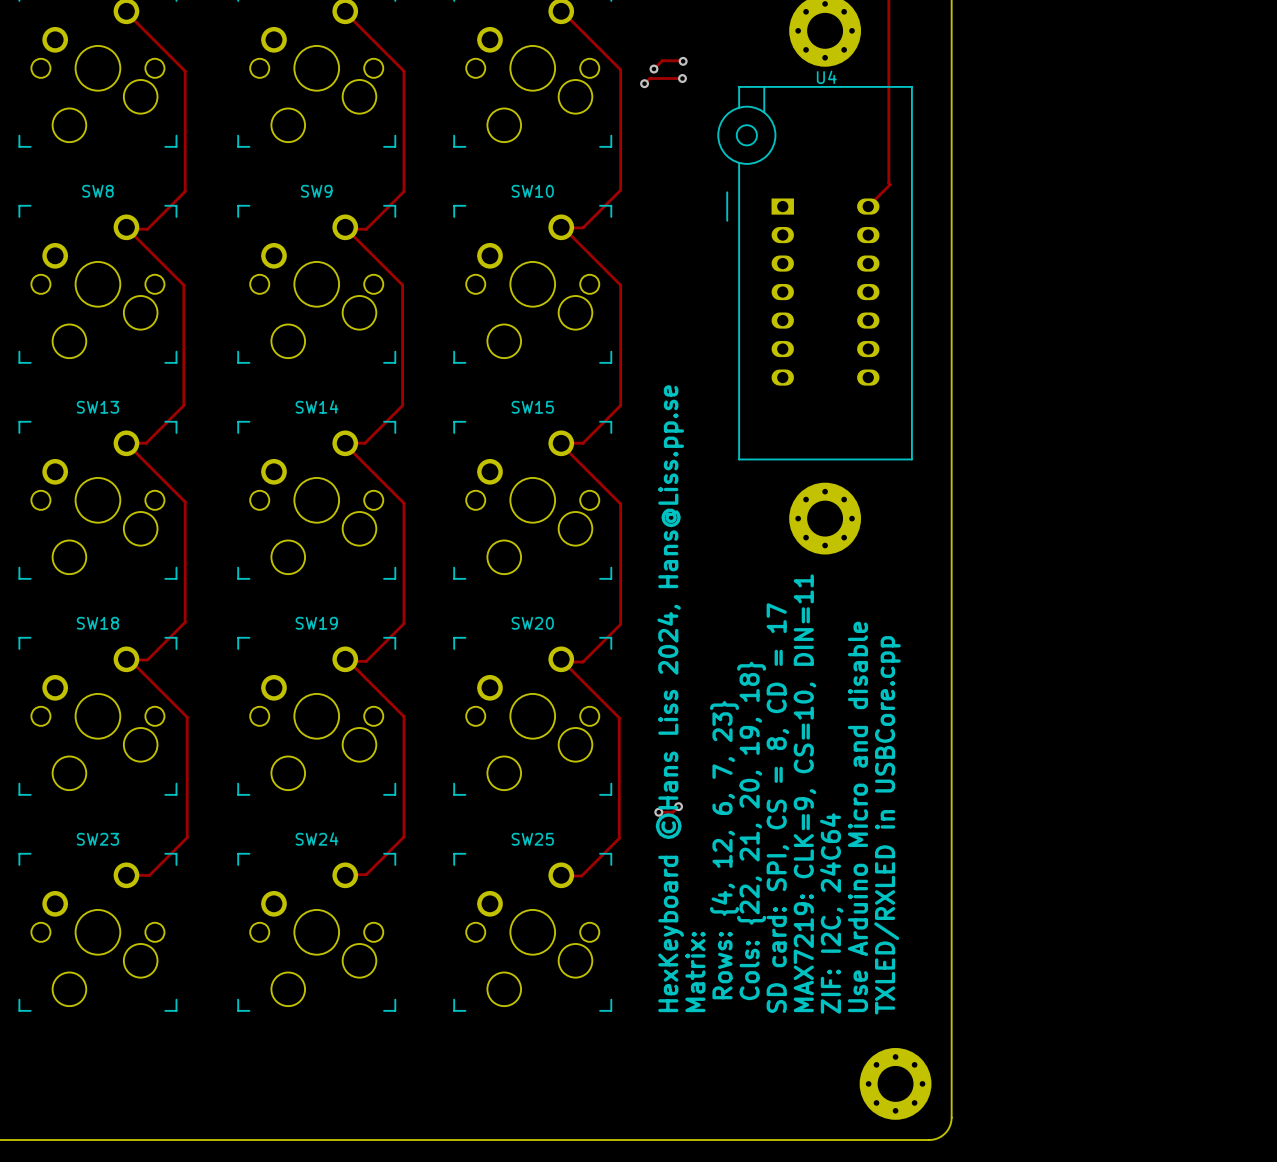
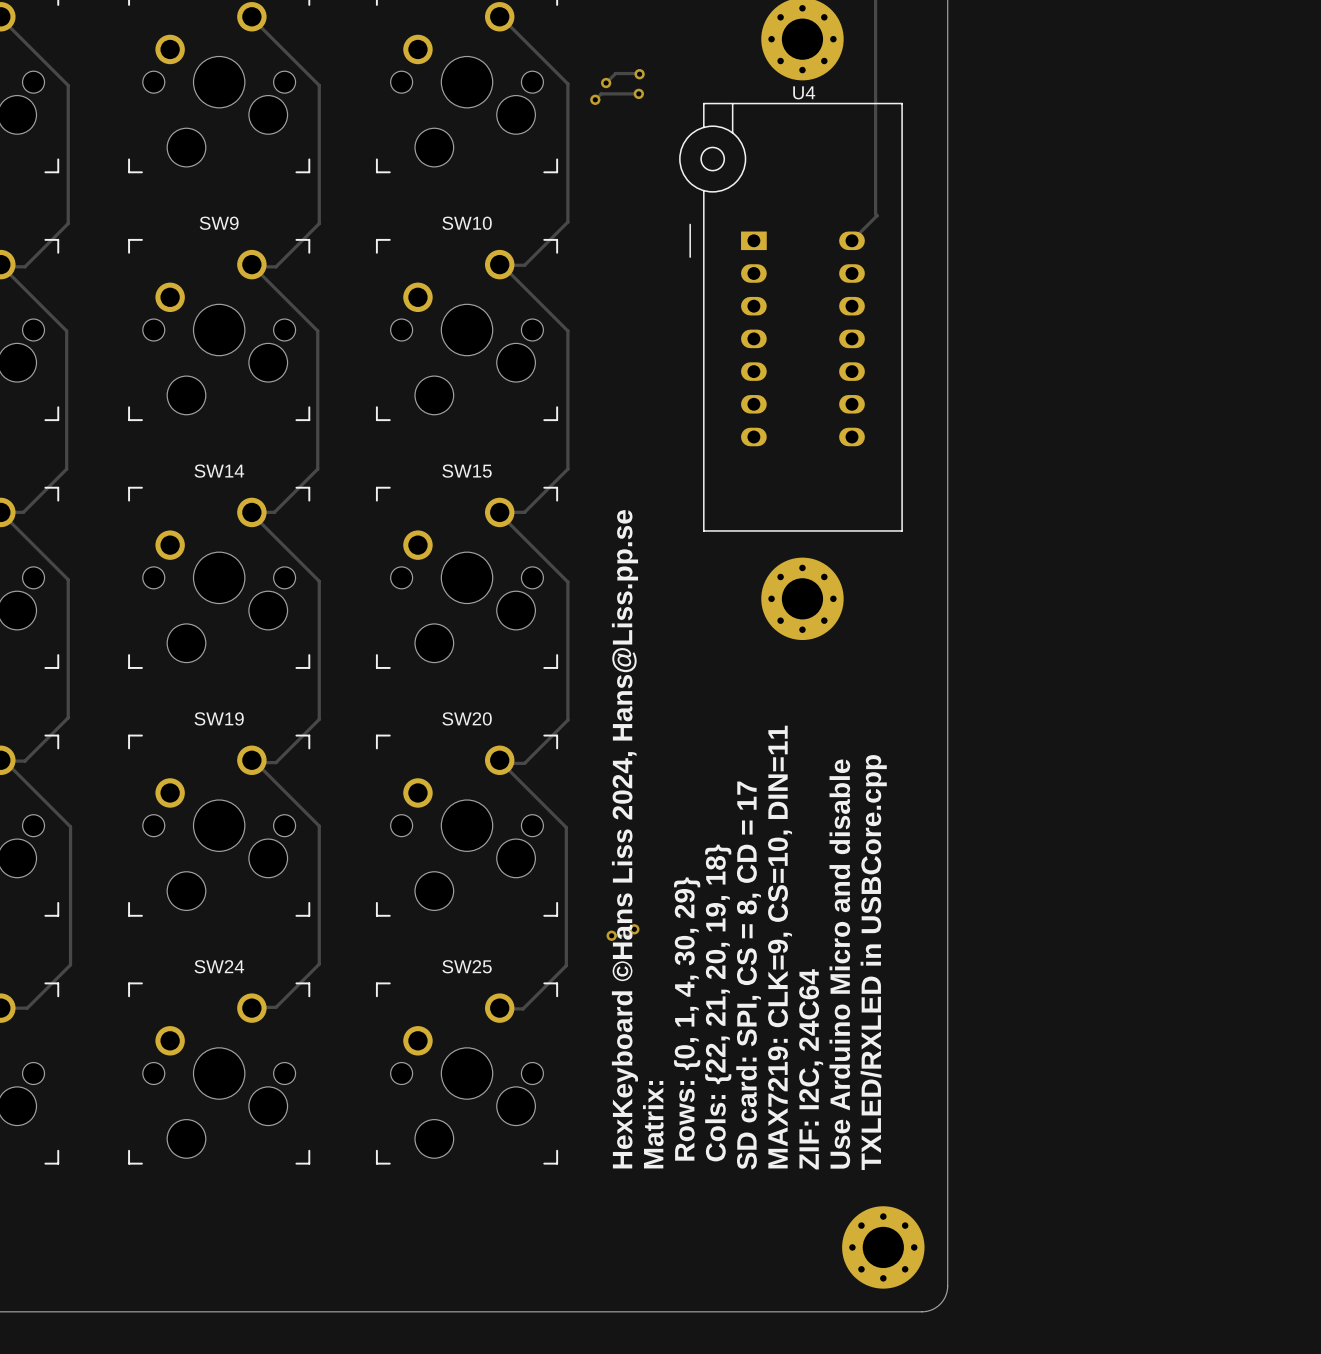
text: Rows: {4, 12, 6, 7, 23} (724, 850) -> Rows: {0, 1, 4, 30, 29} (687, 1019)

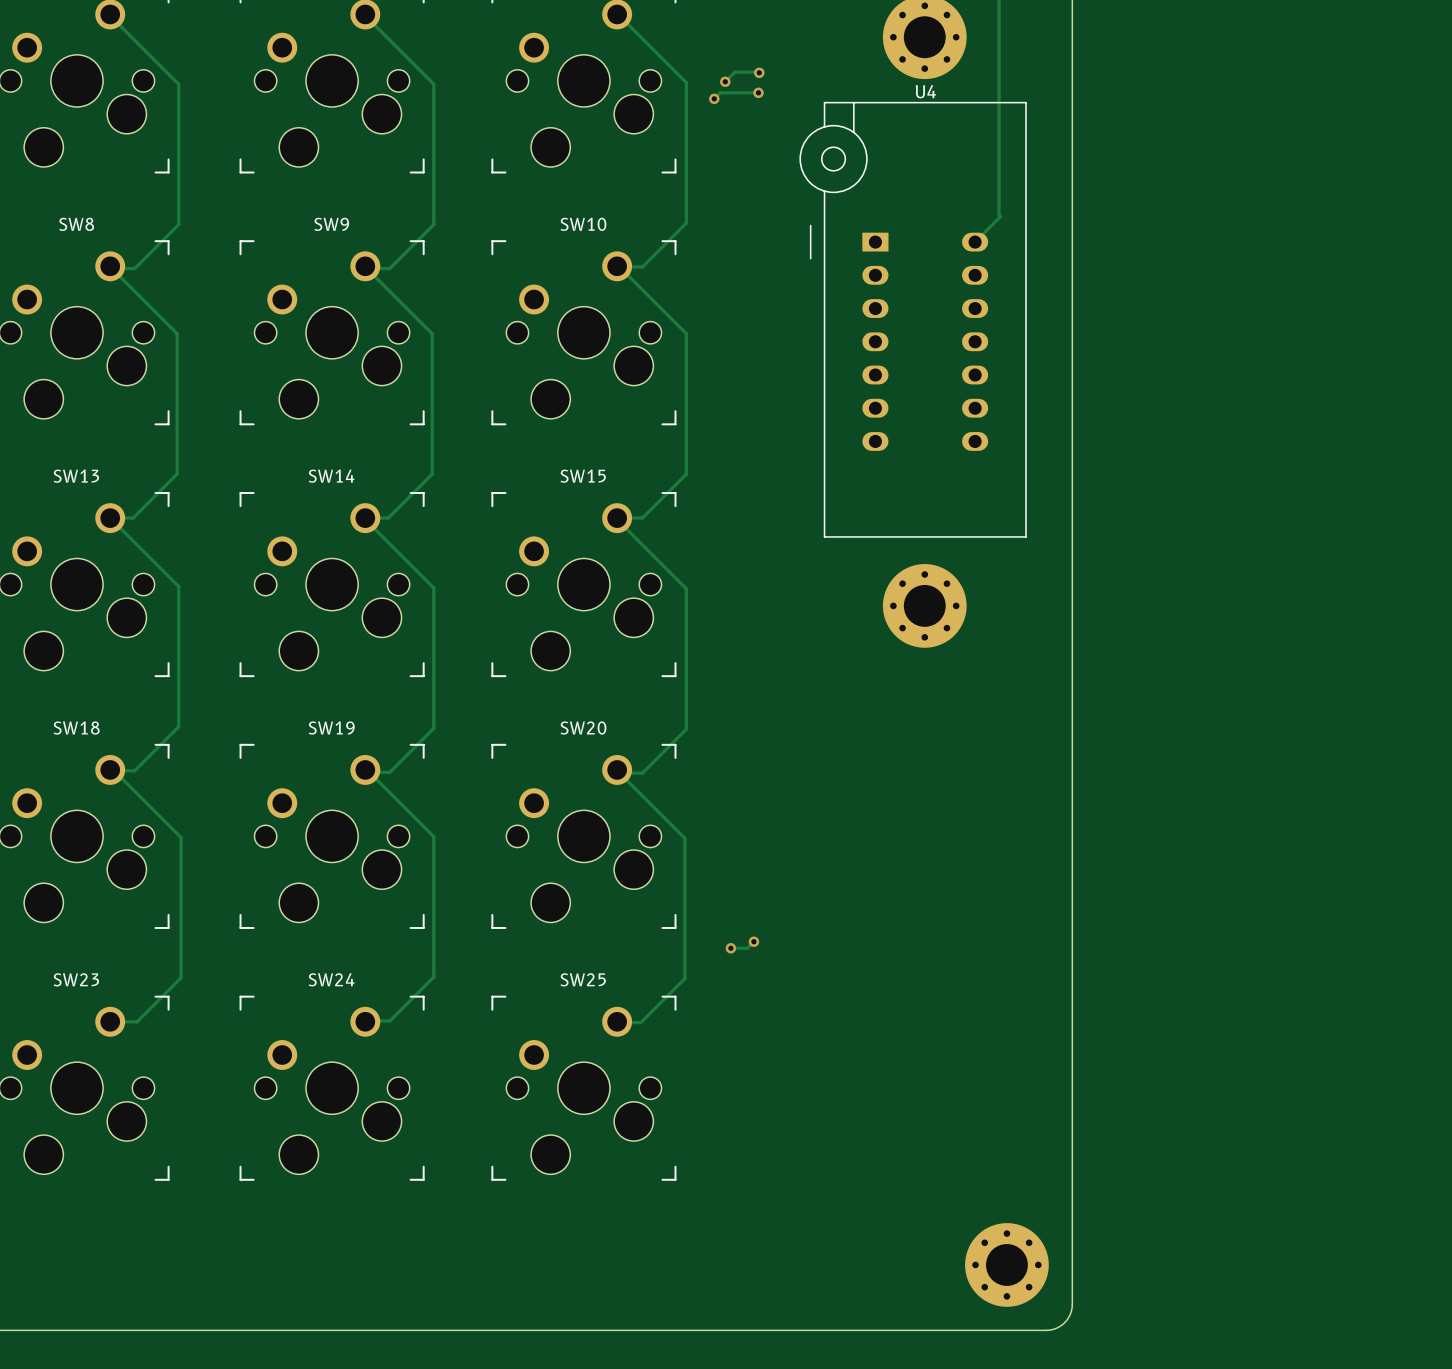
text: HexKeyboard ©Hans Liss 2024, Hans@Liss.pp.se (624, 839) -> none
text: MAX7219: CLK=9, CS=10, DIN=11 (780, 947) -> none
text: TXLED/RXLED in USBCore.cpp (873, 962) -> none
text: Use Arduino Micro and disable (839, 964) -> none
text: SD card: SPI, CS = 8, CD = 17 (748, 975) -> none
text: Cols: {22, 21, 20, 19, 18} (718, 1003) -> none
text: Rows: {0, 1, 4, 30, 29} (687, 1019) -> none
text: ZIF: I2C, 24C64 (811, 1069) -> none
text: Matrix: (653, 1124) -> none

